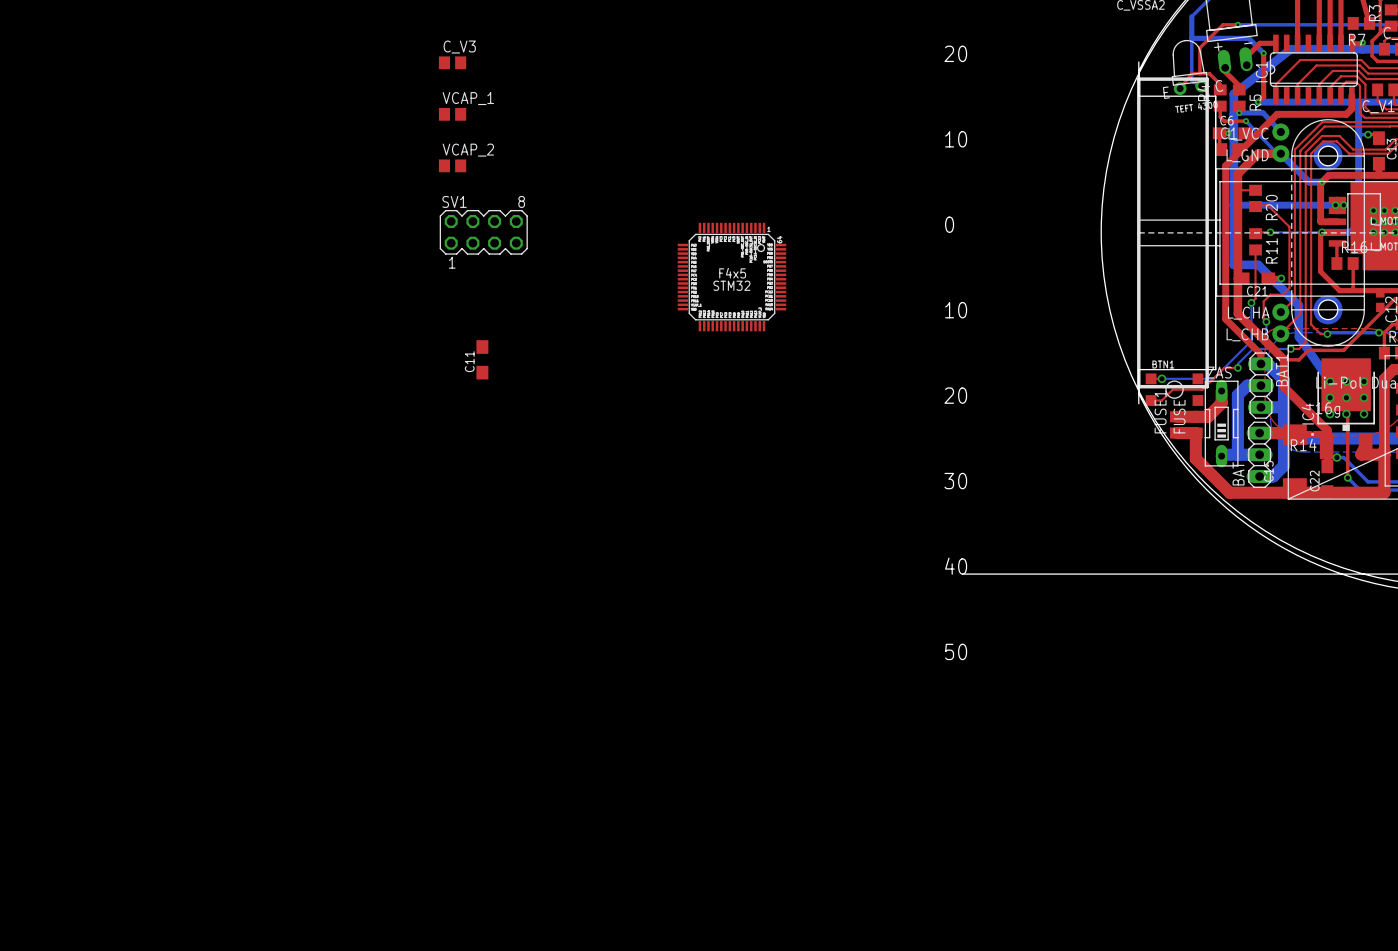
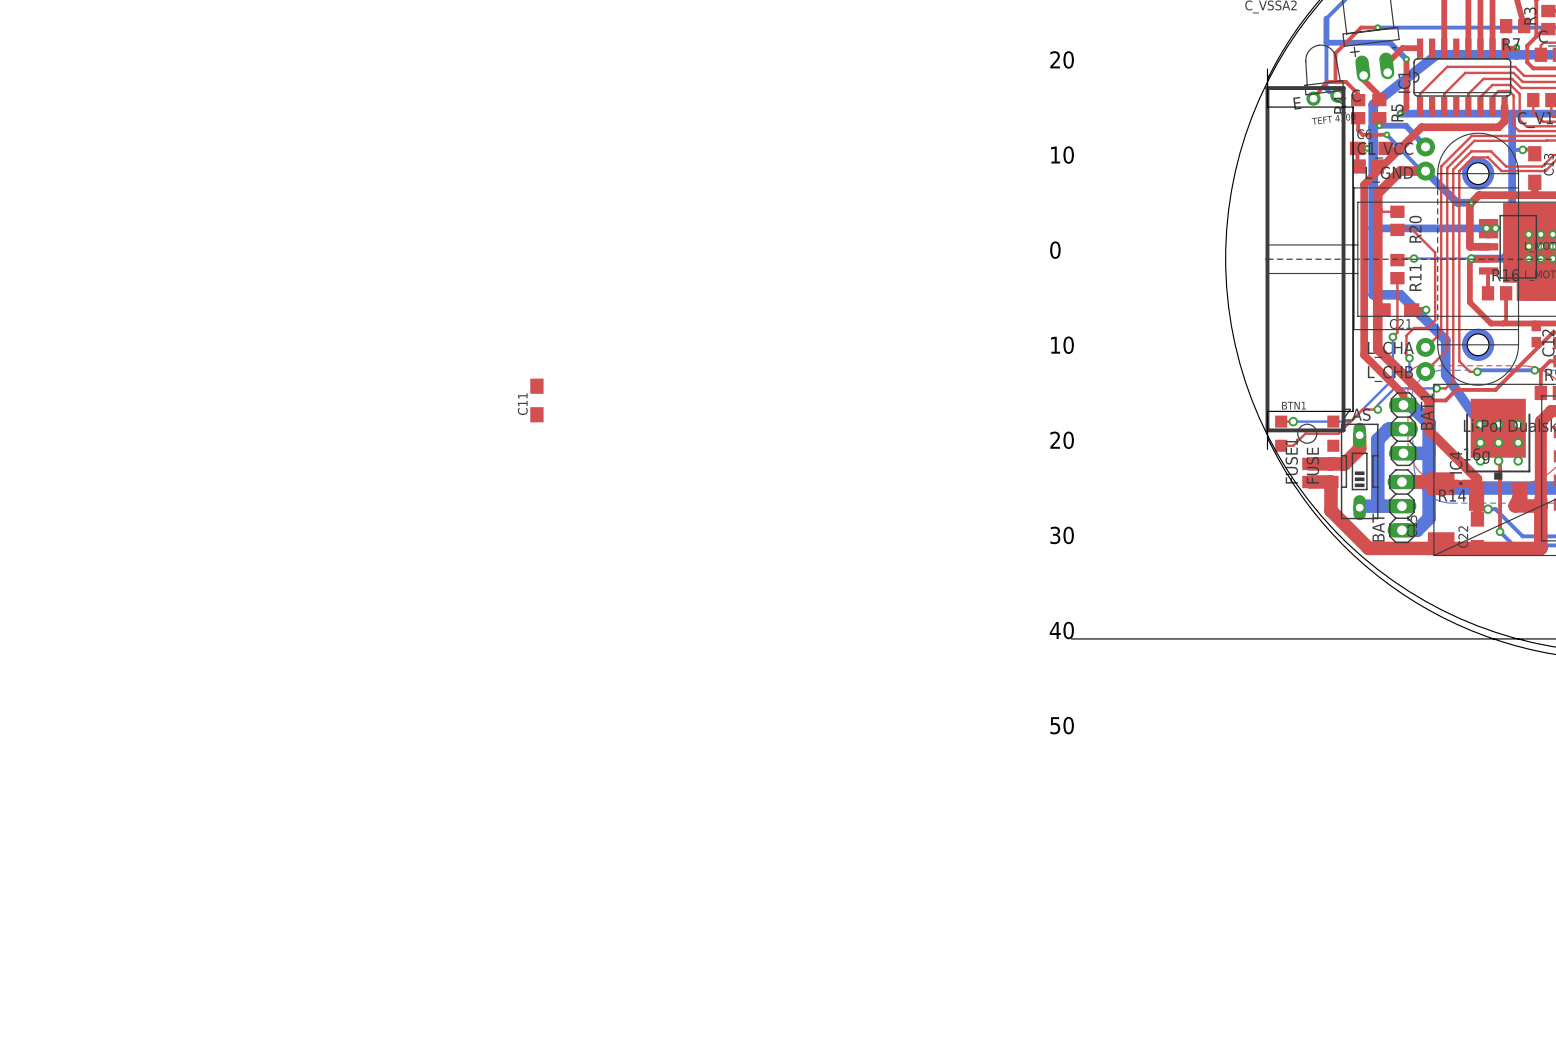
C_V3: (452, 62) -> none
VCAP_1: (452, 114) -> none
VCAP_2: (452, 165) -> none
SV1: (483, 232) -> none
part: (731, 277) -> none

